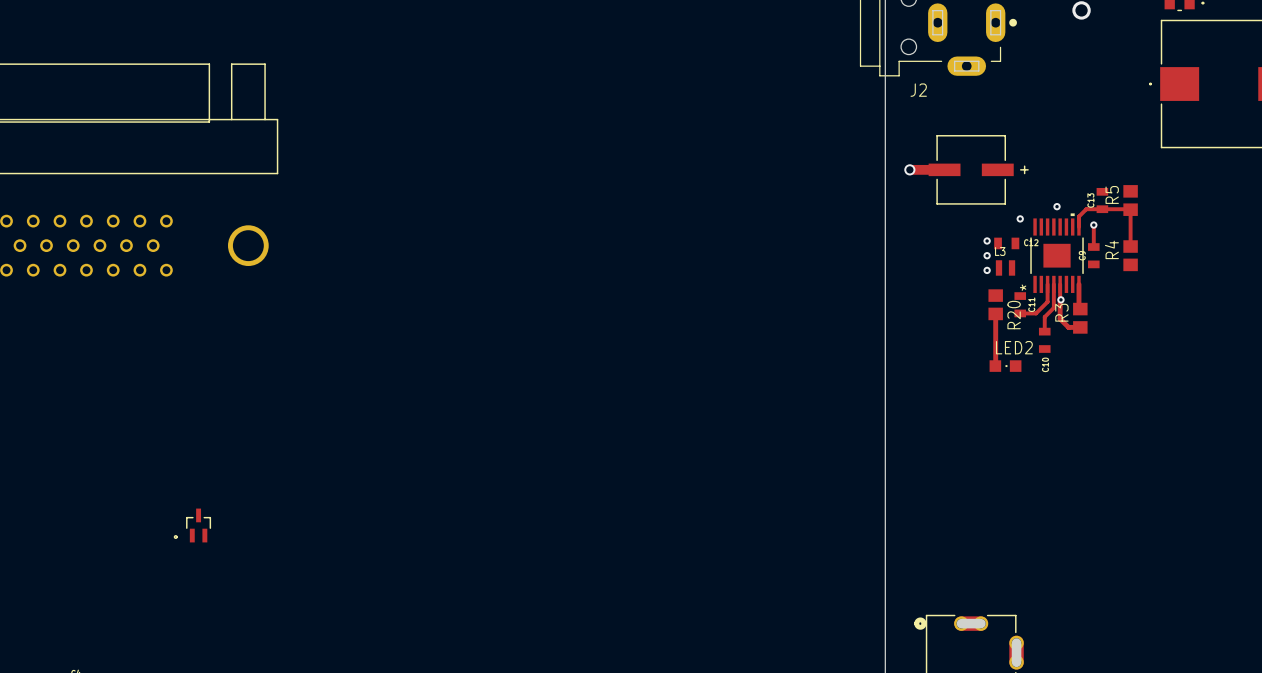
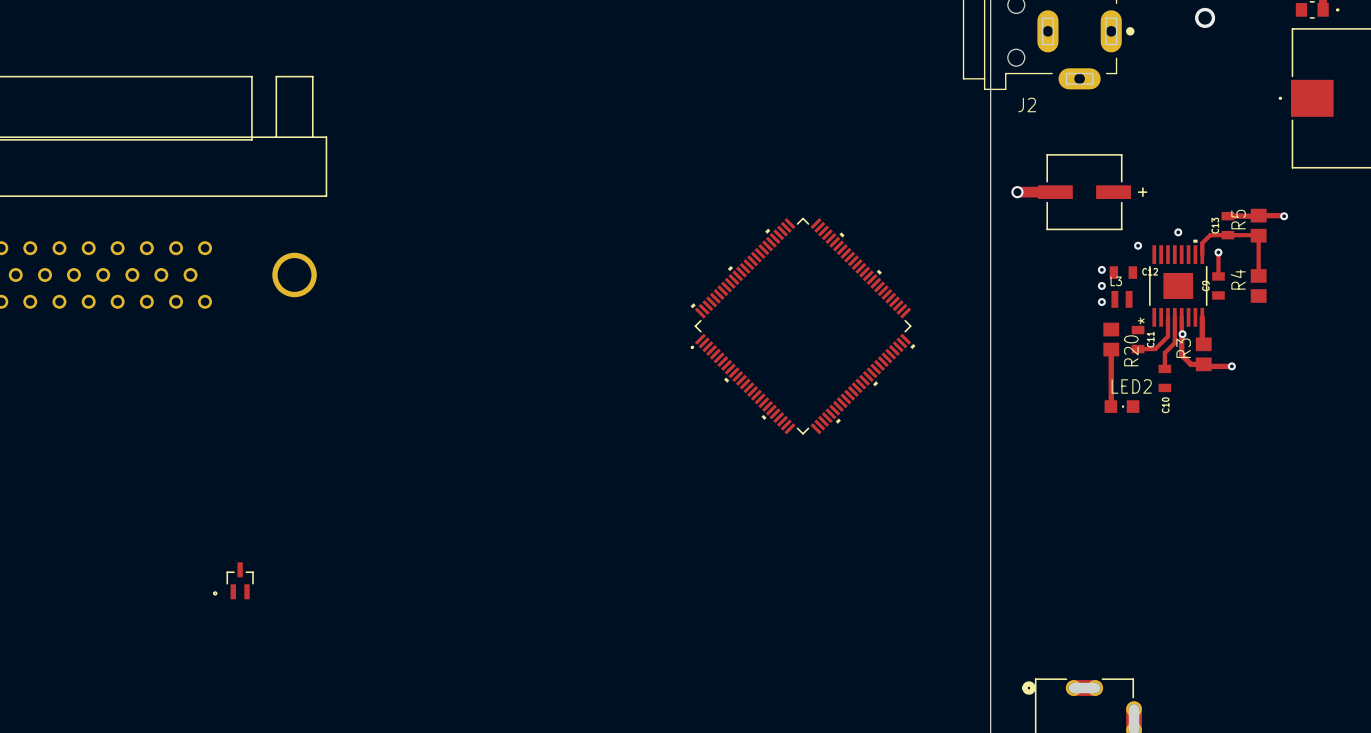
track: none -> (1227, 216) (1284, 216)
via: none -> (1284, 216)
part: none -> (803, 326)
track: none -> (1203, 364) (1205, 366) (1231, 366)
via: none -> (1231, 366)

